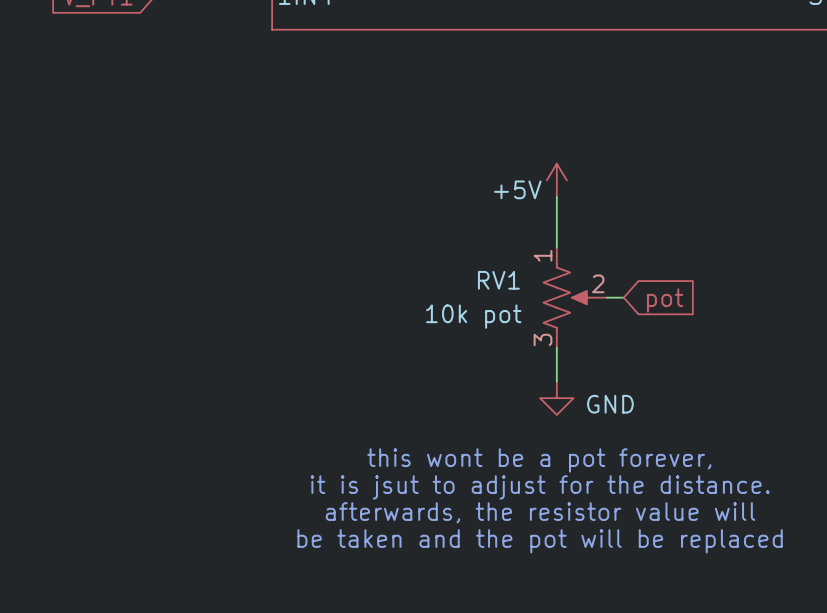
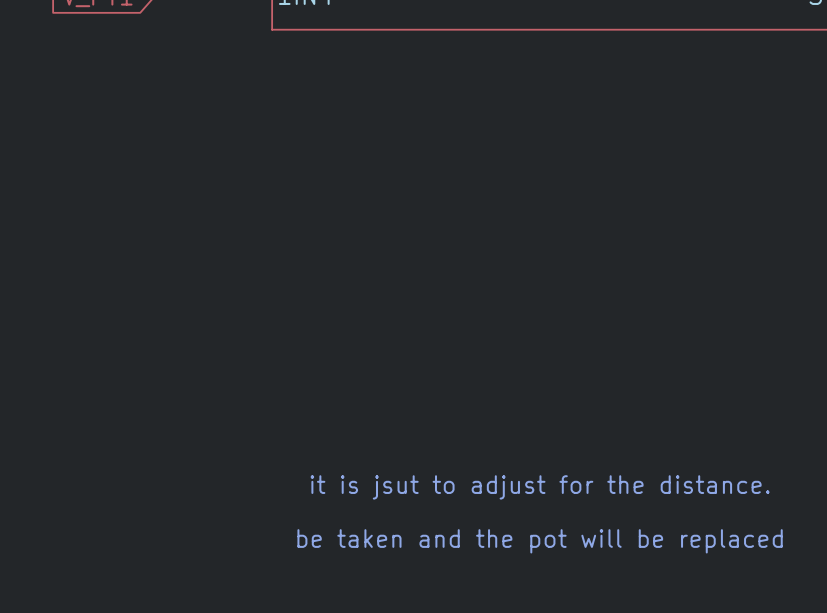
power symbol: +5V (556, 180) -> none
wire: (556, 197) (556, 247) -> none
RV1: 10k pot (575, 297) -> none
wire: (607, 297) (623, 297) -> none
global label: pot (665, 300) -> none
wire: (556, 347) (556, 381) -> none
power symbol: GND (556, 398) -> none
text: this wont be a pot forever, (539, 460) -> none
text: afterwards, the resistor value will (540, 512) -> none

